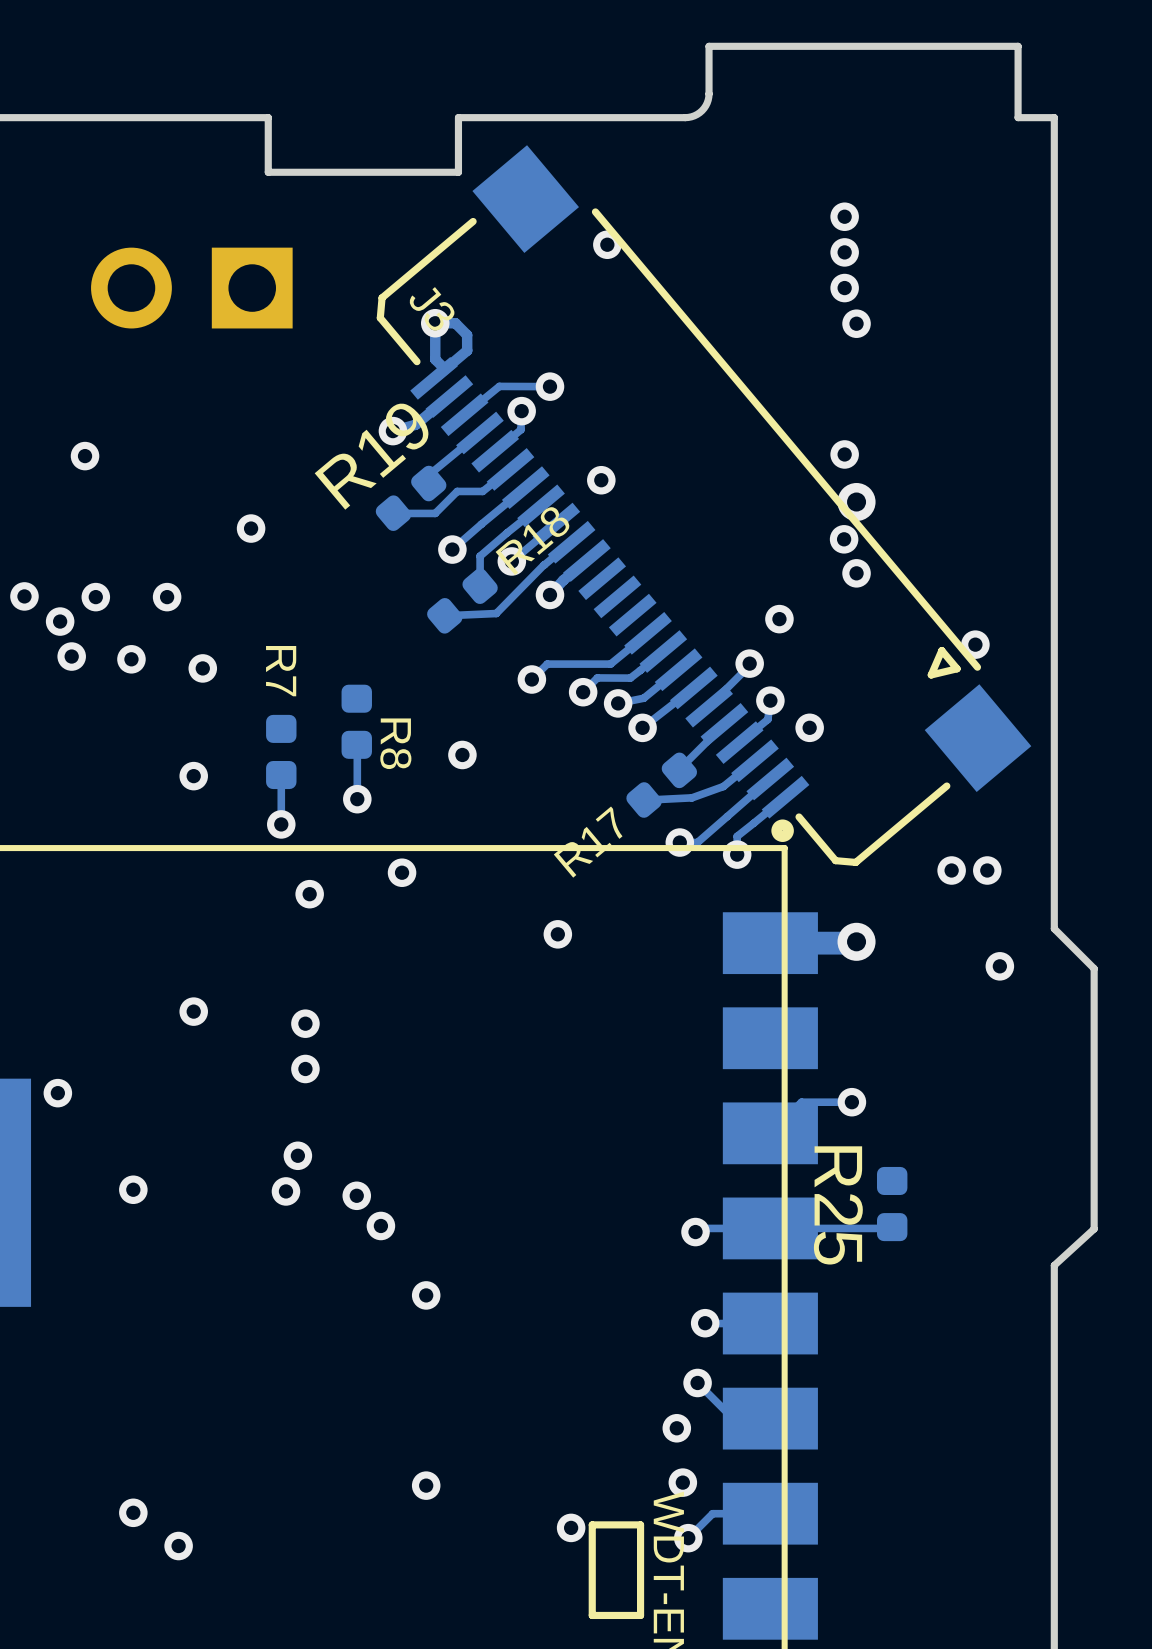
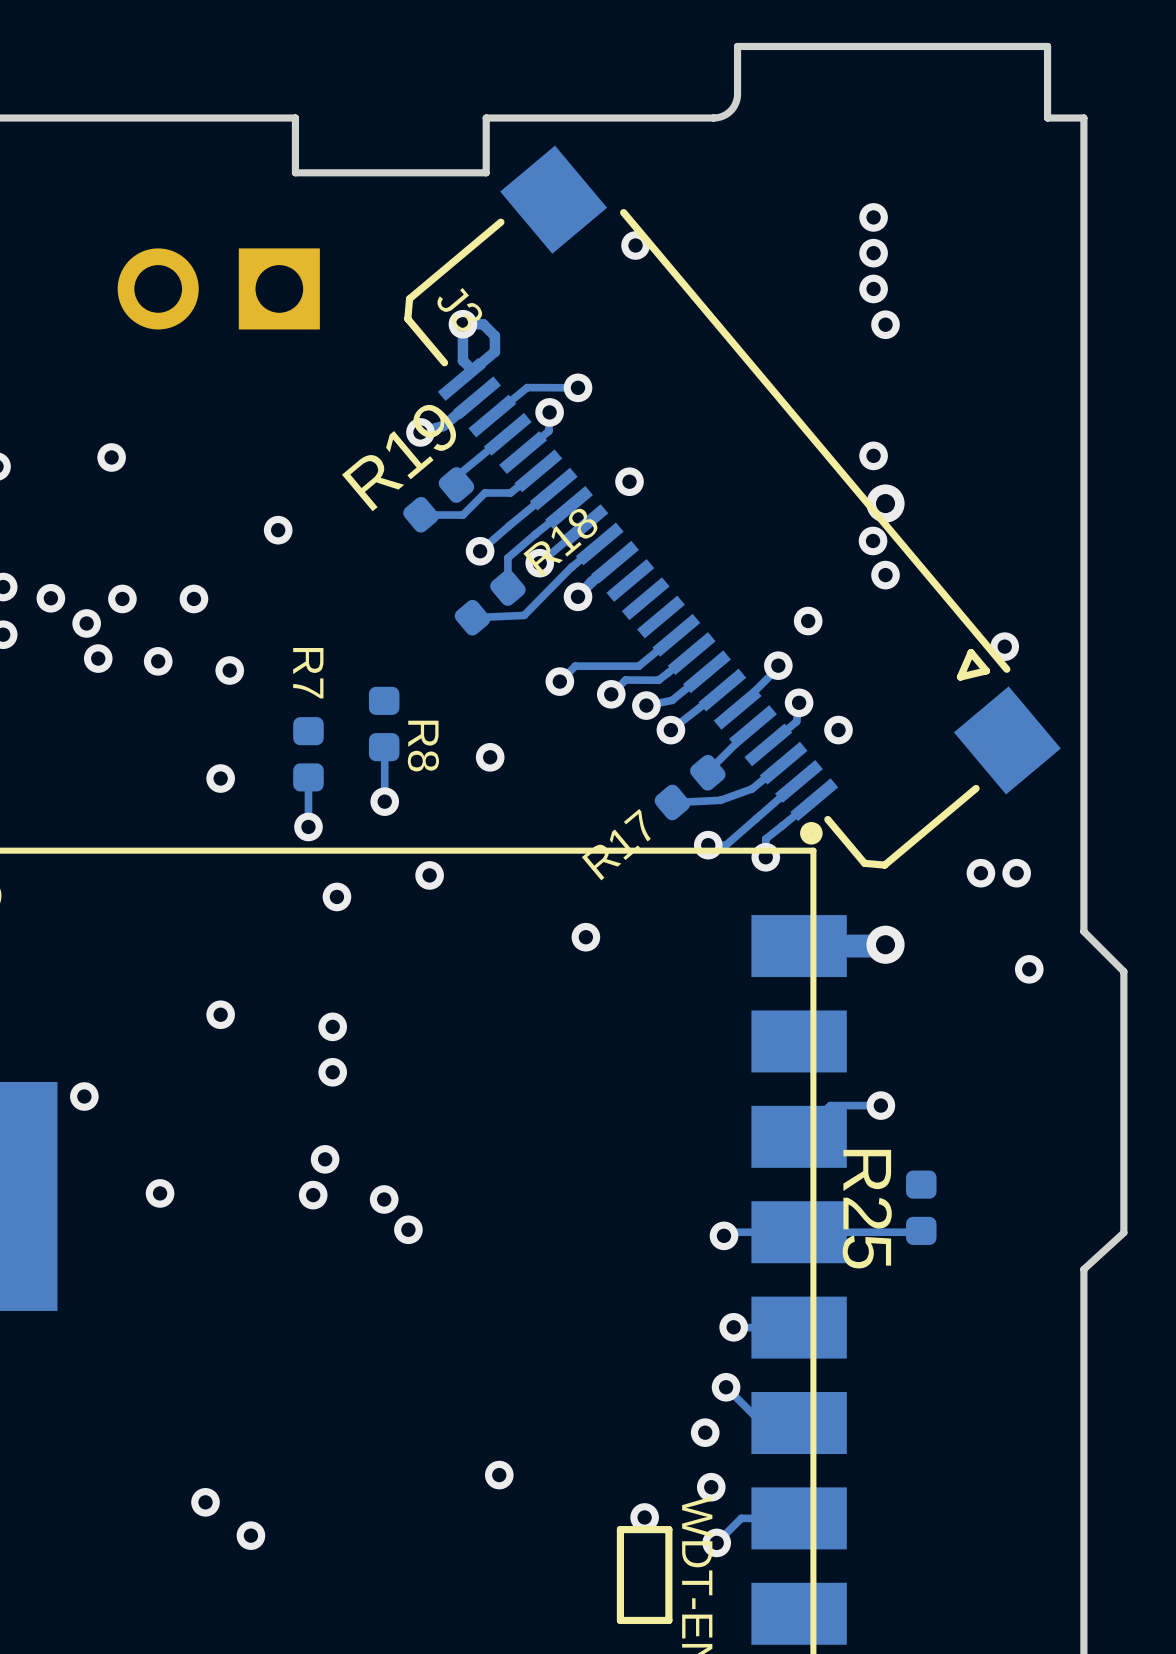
via: (426, 1295) -> none
via position: (426, 1485) -> (499, 1475)
via: none -> (205, 1502)
via: (133, 1512) -> none
via position: (571, 1527) -> (644, 1517)
via: none -> (250, 1535)
via: (178, 1546) -> none

